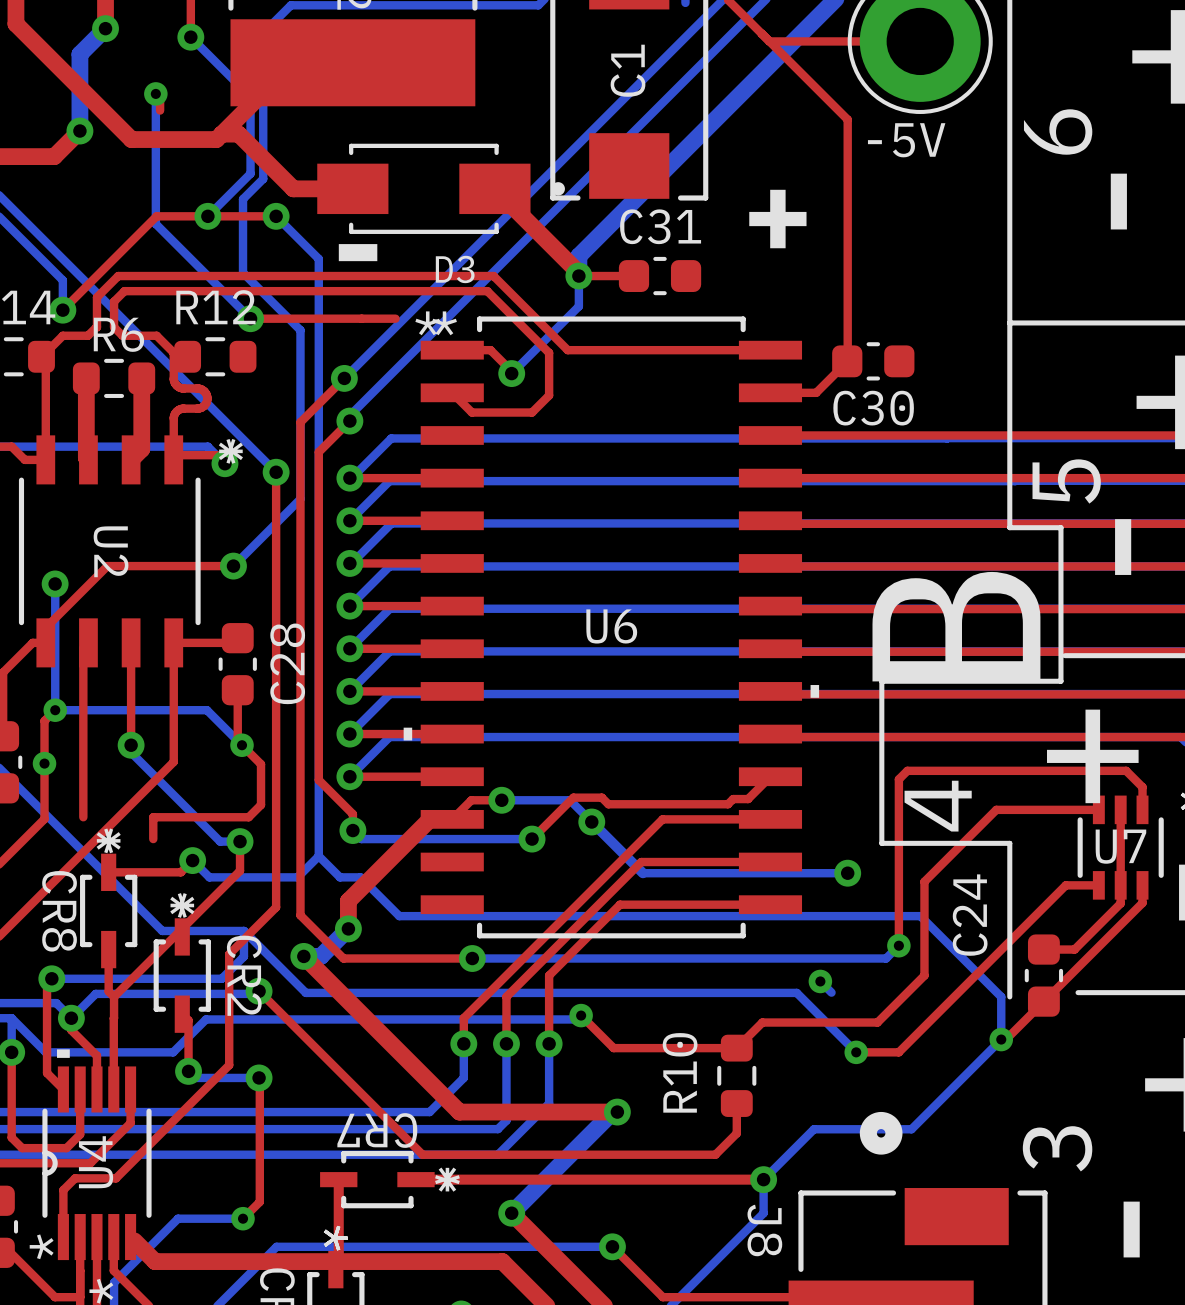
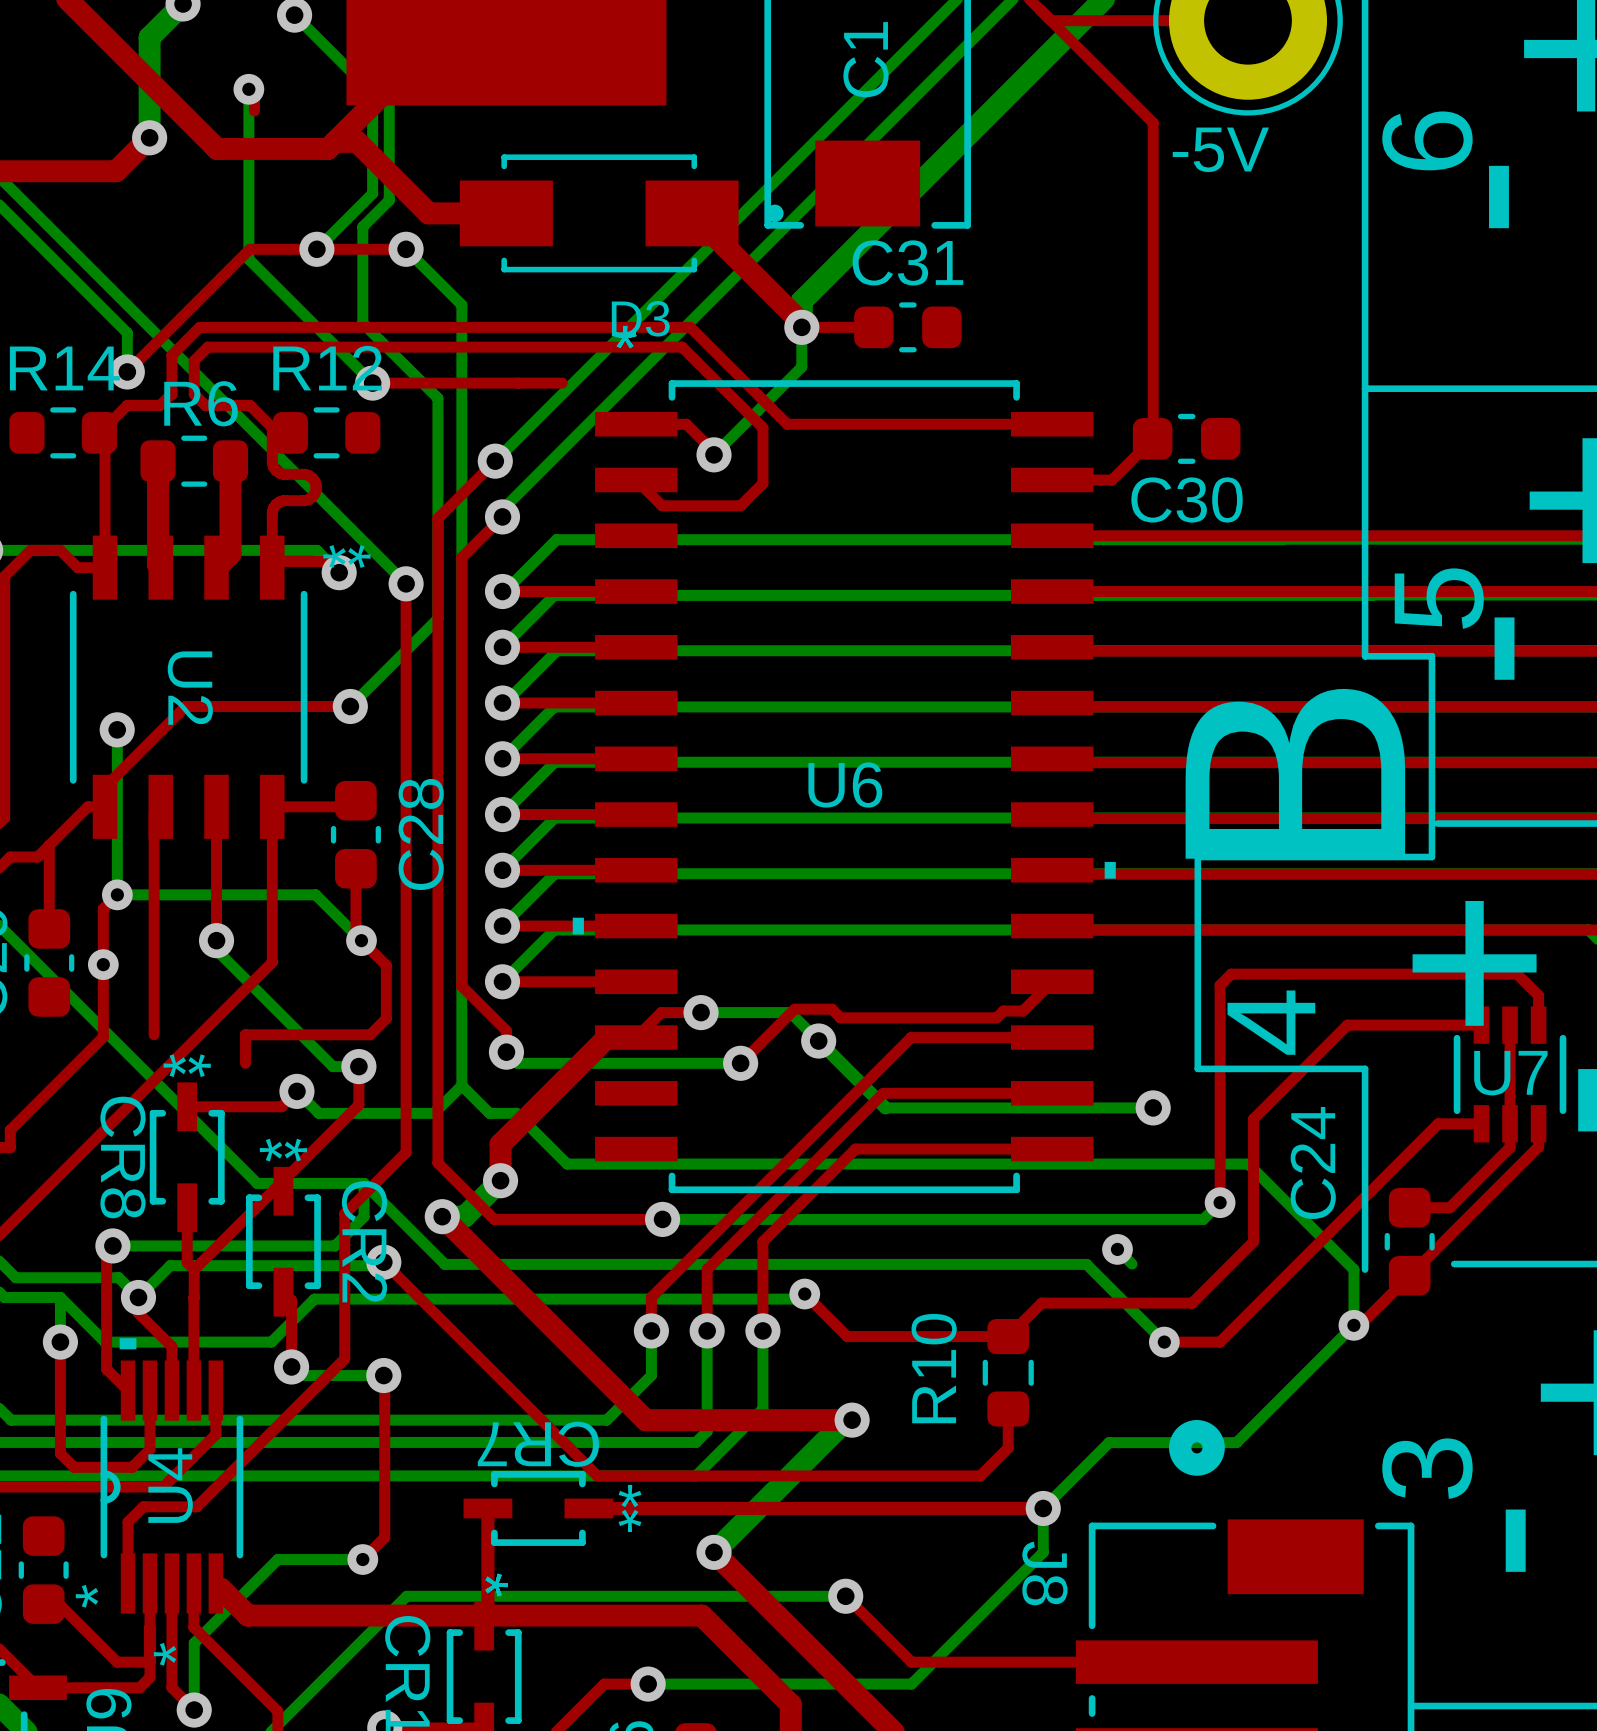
text: + (777, 219) -> none
text: - (358, 252) -> none
U6 footprint: [403, 316, 820, 939] -> [572, 380, 1116, 1194]

